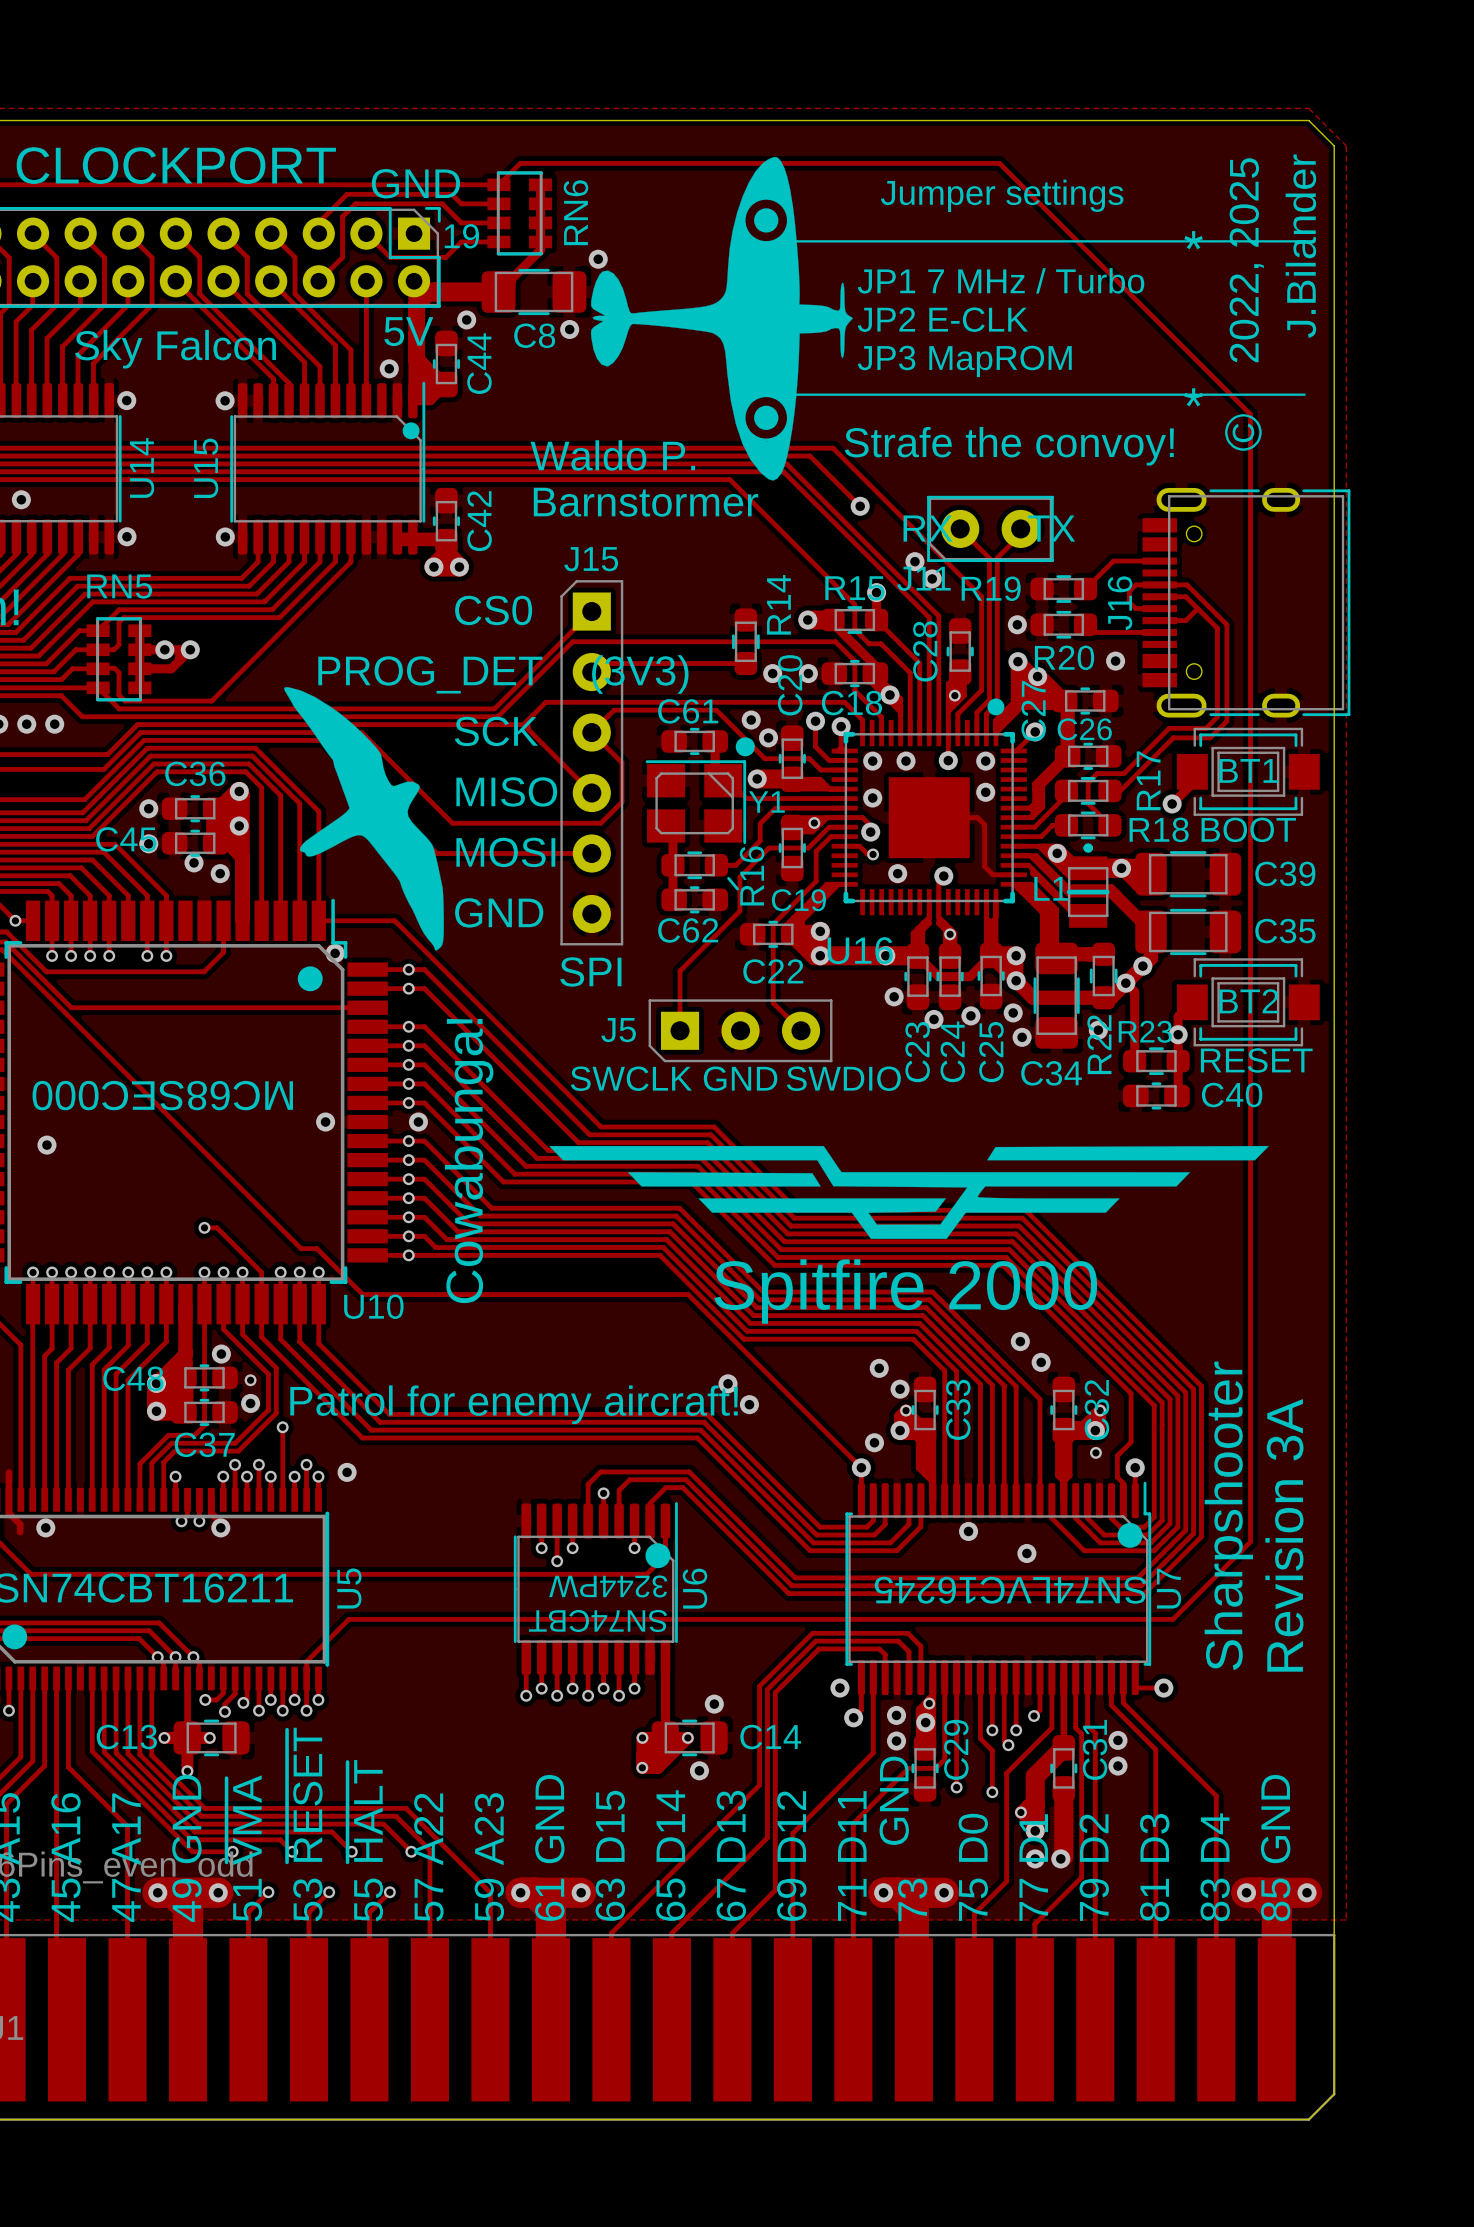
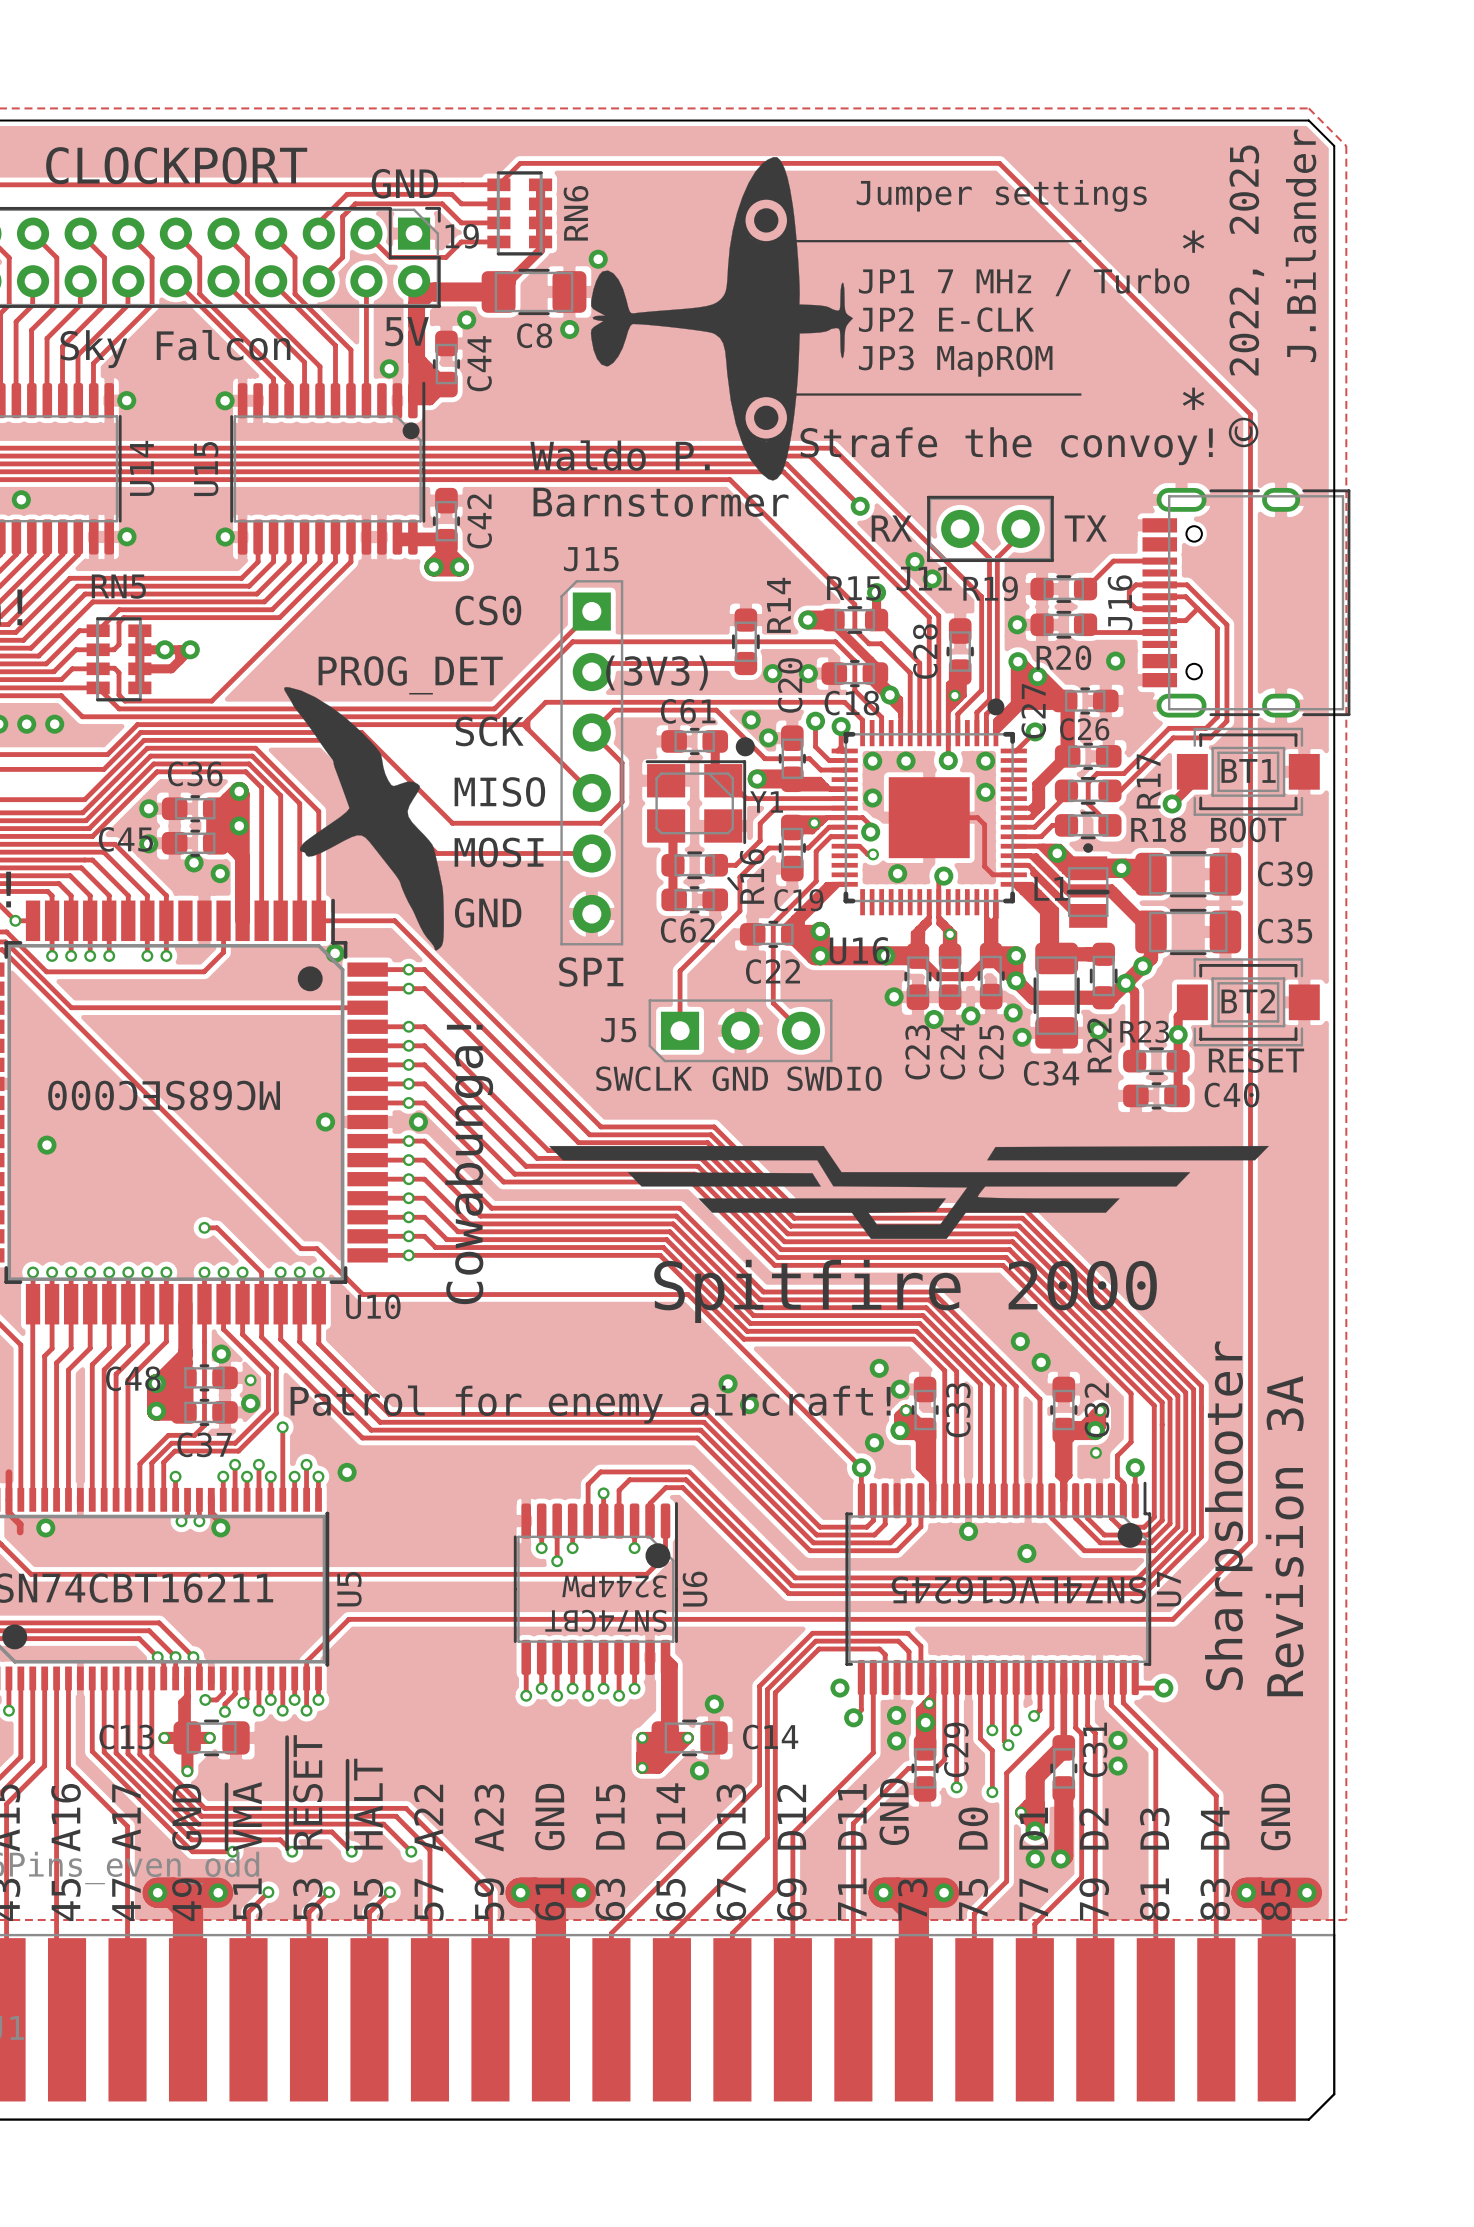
track: none -> (665, 1657) (673, 1665) (673, 1729) (665, 1737)
track: none -> (187, 1696) (181, 1702) (181, 1732) (187, 1737)

